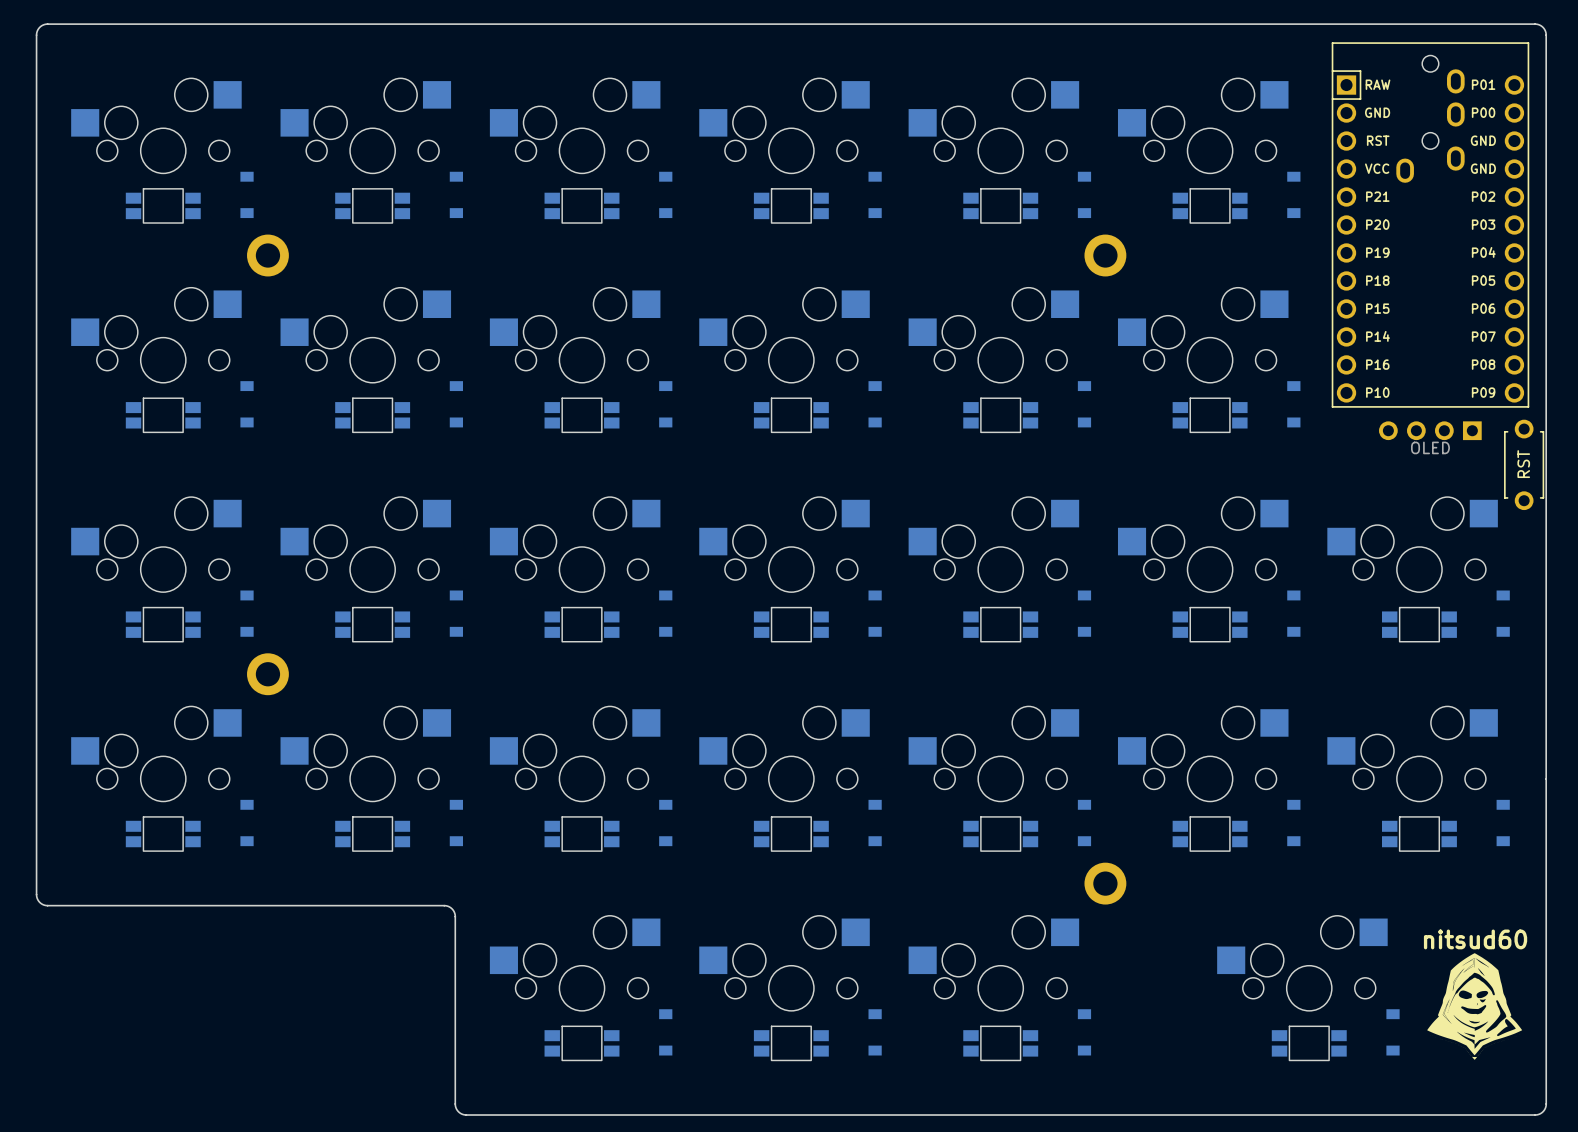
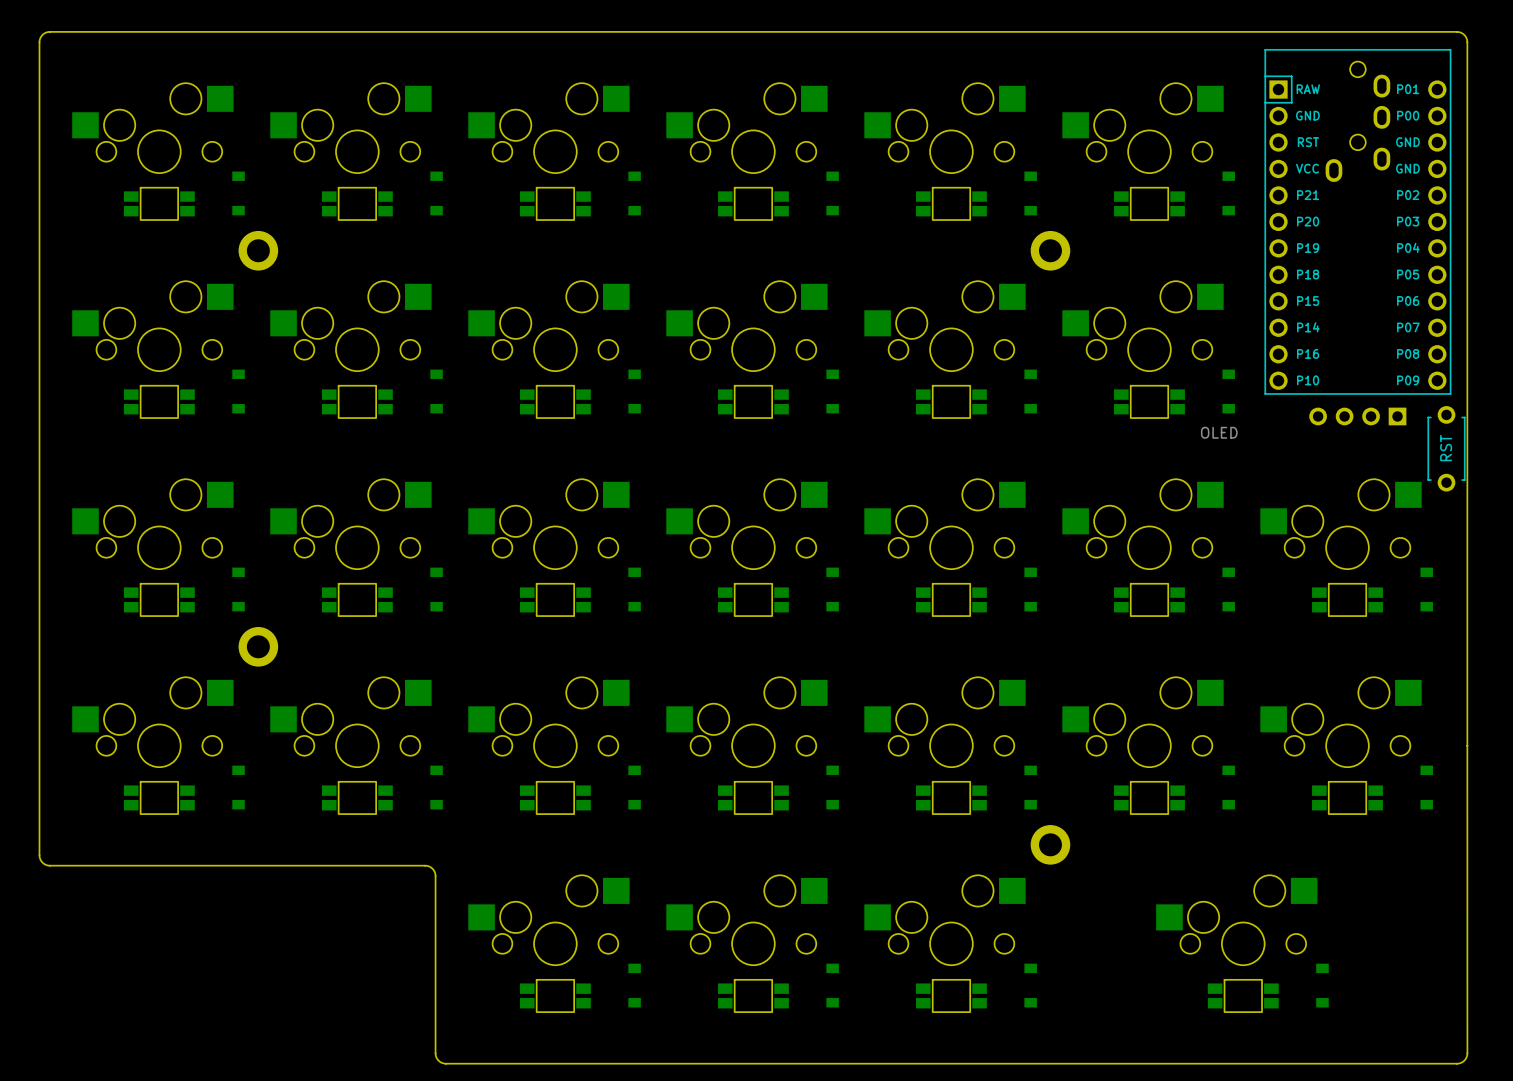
part value position: OLED (1430, 447) -> OLED (1219, 432)
text: nitsud60 (1475, 939) -> none
drawing: [1427, 953, 1523, 1060] -> none

